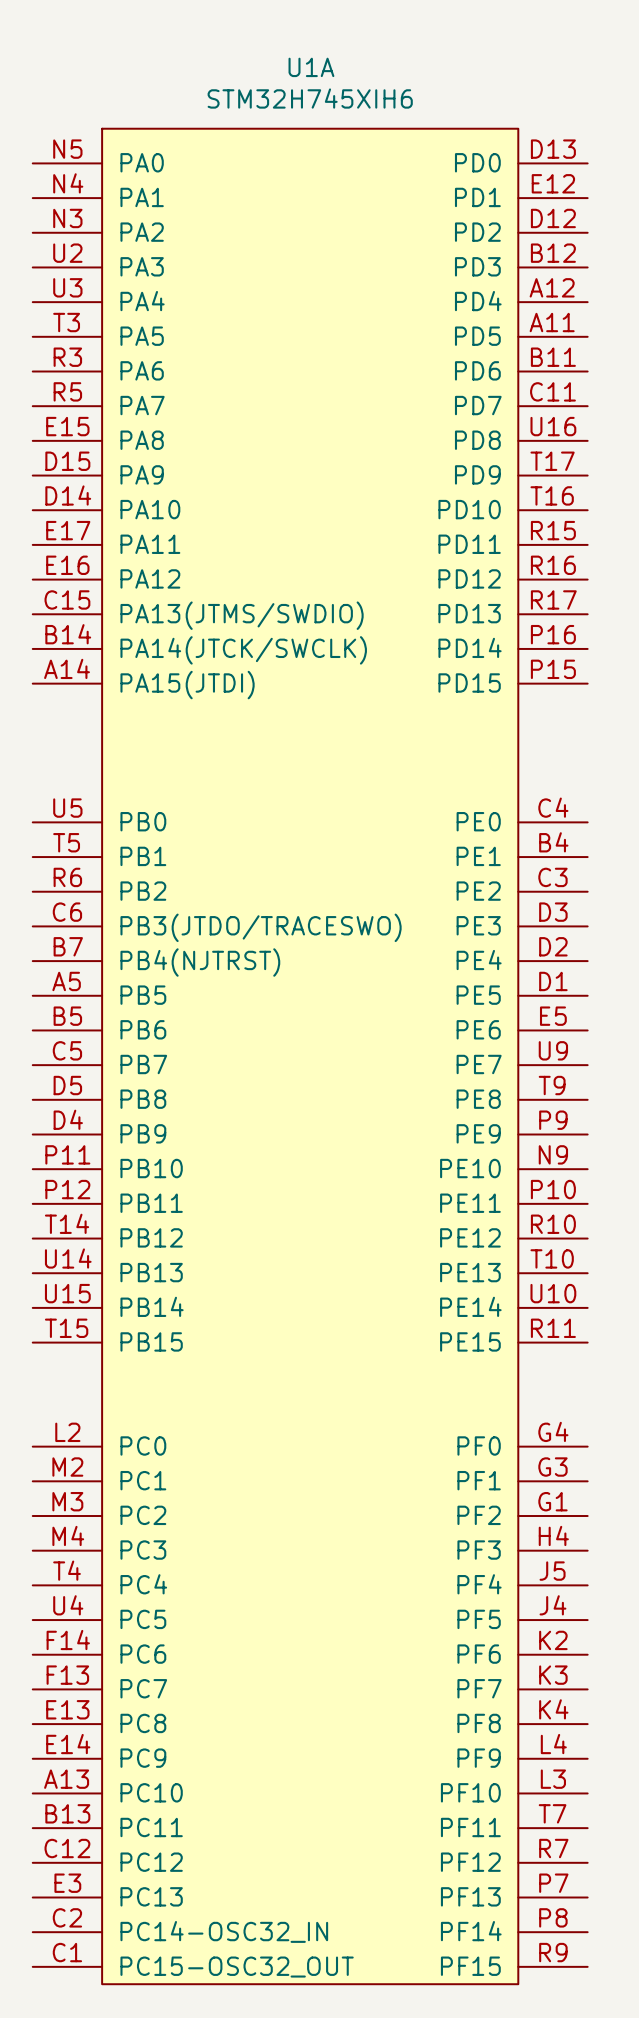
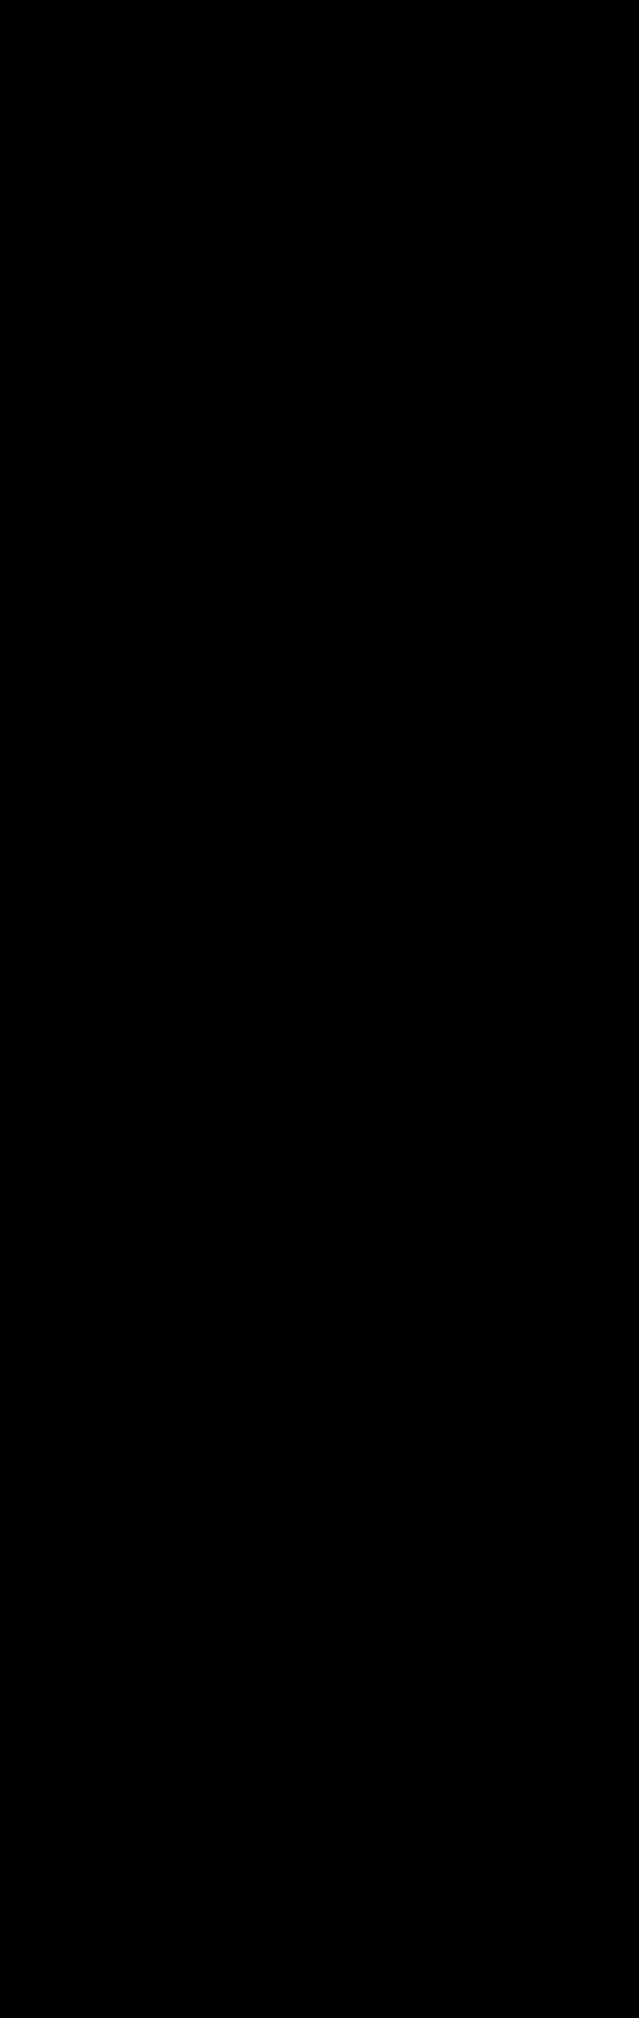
U1A: (310, 1056) -> none

